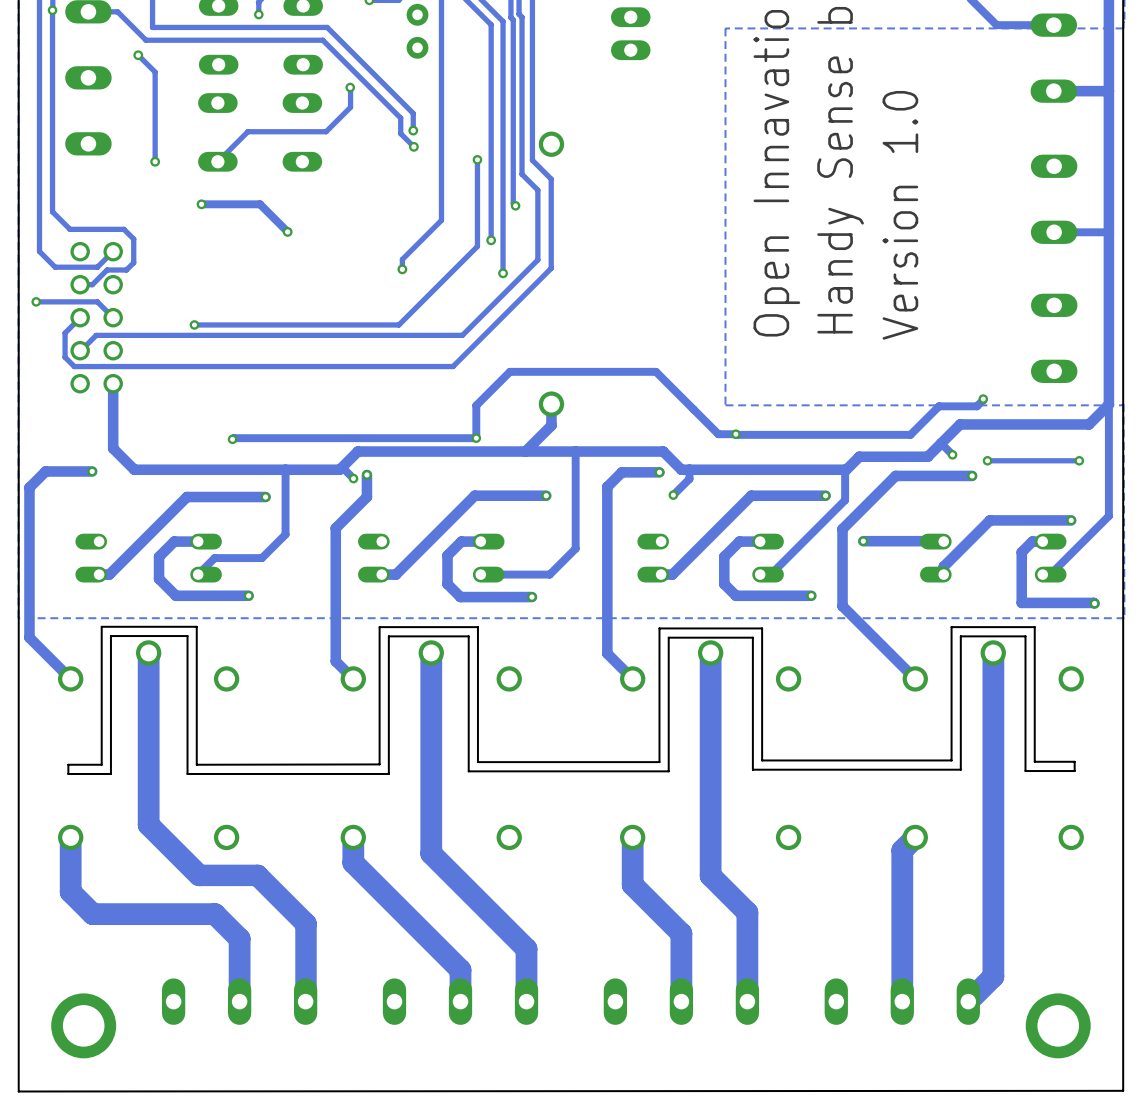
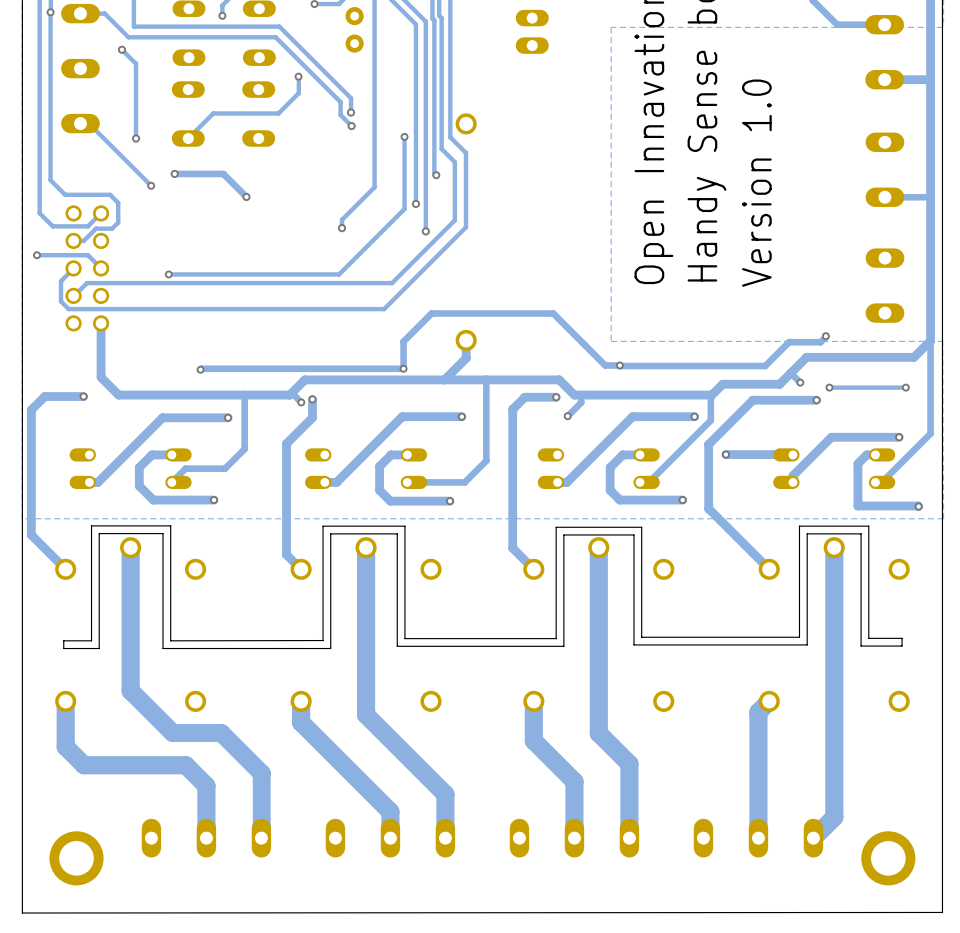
track: none -> (80, 123) (88, 123) (151, 185)
via: none -> (151, 185)

